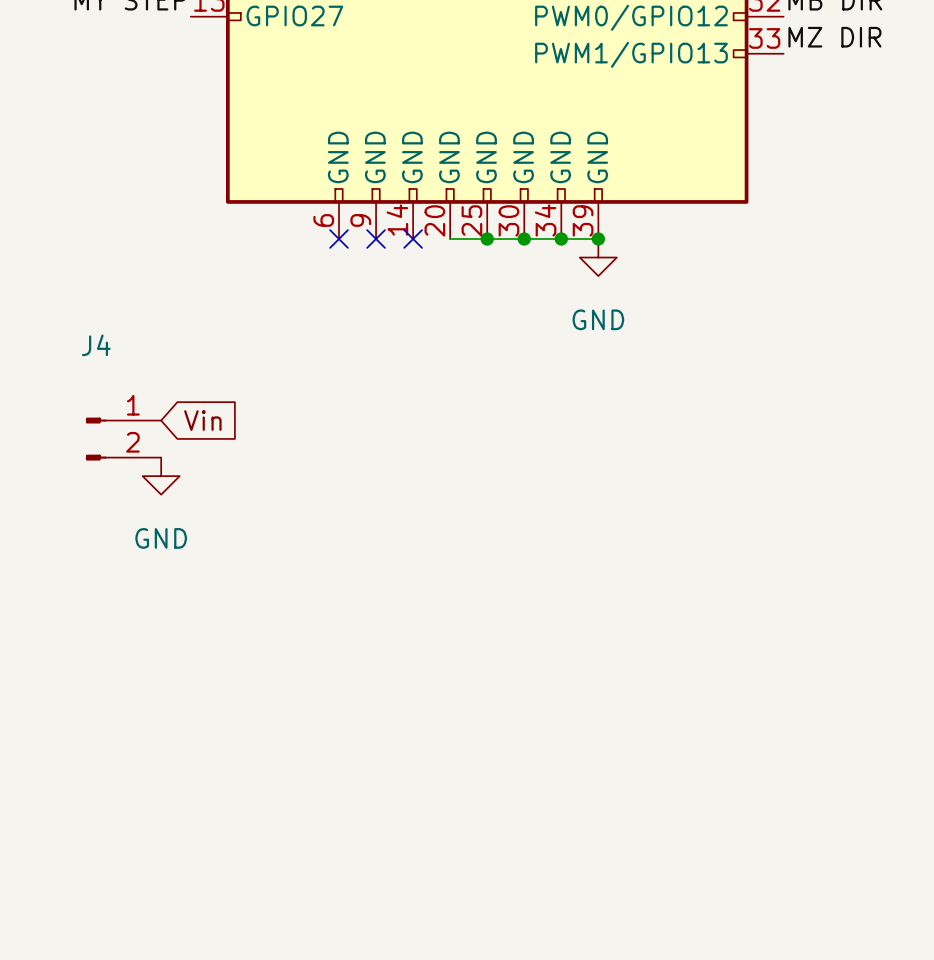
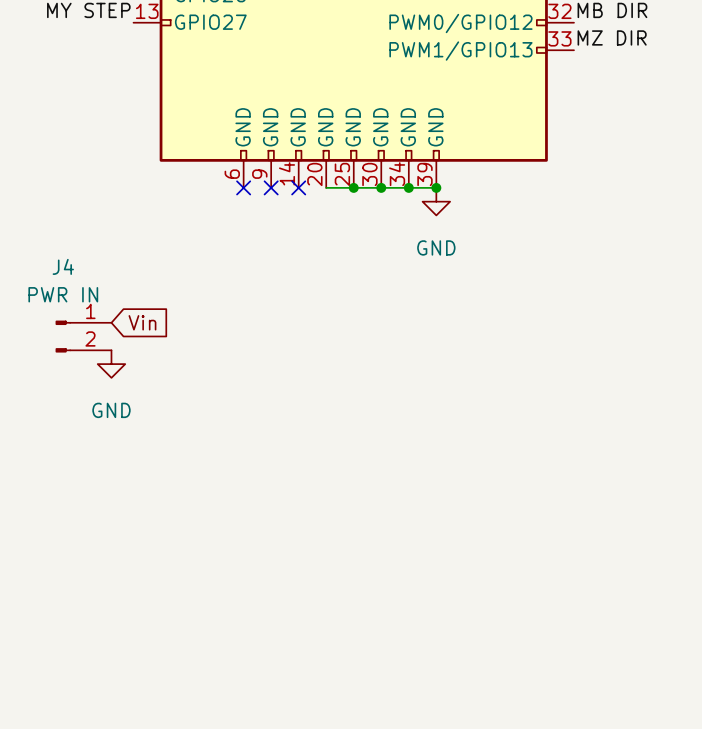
J4 value: none -> PWR IN (63, 294)

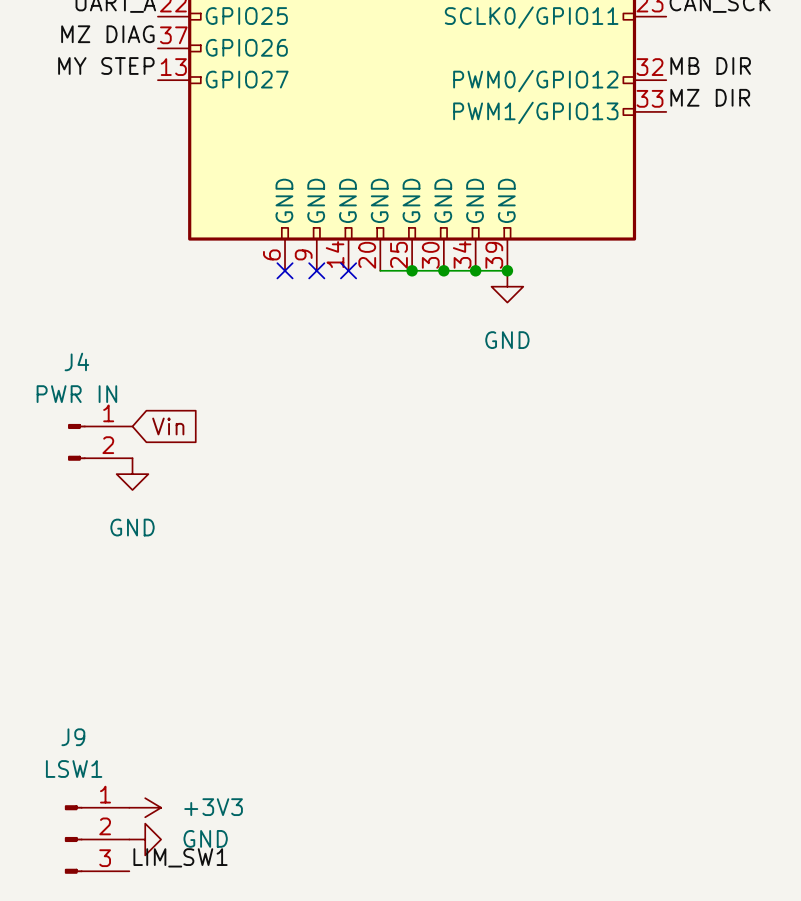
power symbol: none -> +3V3 (145, 807)
J9: none -> LSW1 (97, 839)
power symbol: none -> GND (145, 839)
label: none -> LIM_SW1 (180, 857)

